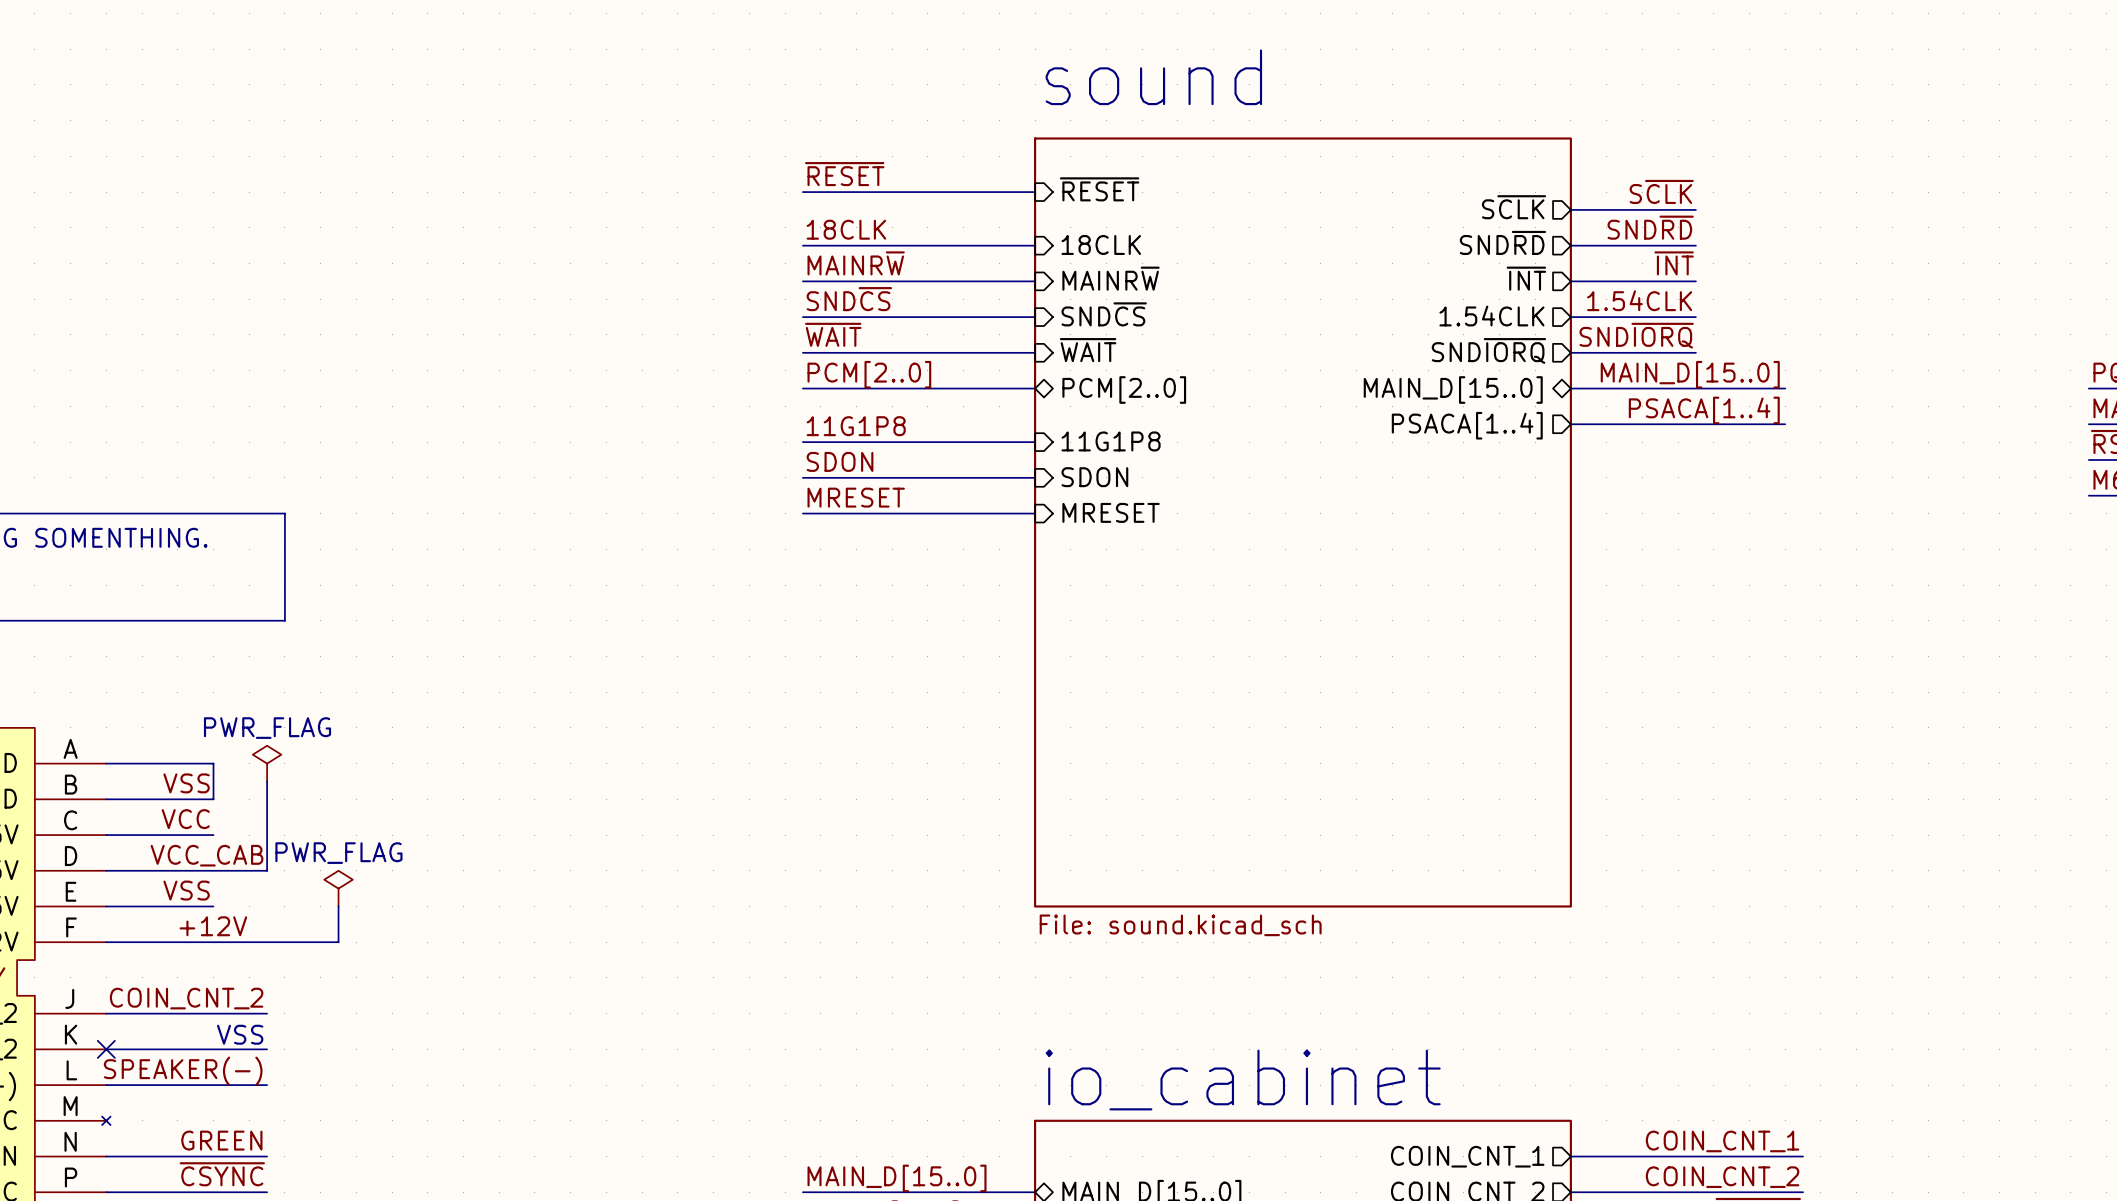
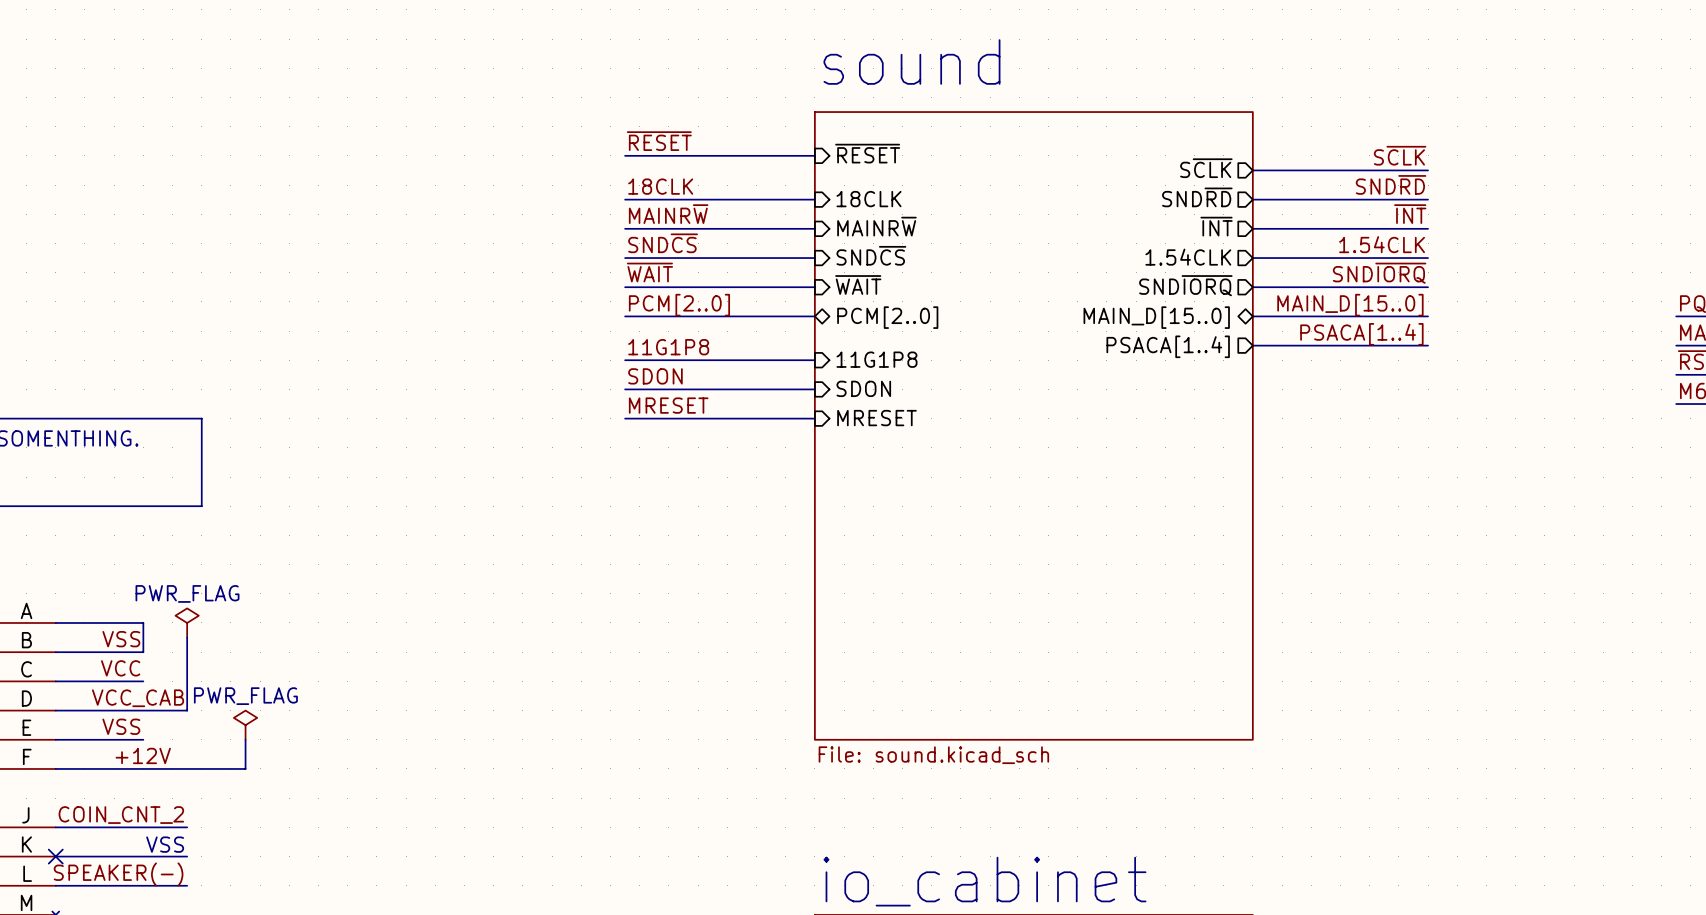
label position: S~{CLK} (1661, 191) -> S~{CLK} (1400, 155)
wire: none -> (1355, 170) (1428, 170)
label position: SND~{RD} (1650, 227) -> SND~{RD} (1391, 184)
wire: none -> (1355, 199) (1428, 199)
label position: ~{INT} (1674, 263) -> ~{INT} (1410, 214)
wire: none -> (1355, 228) (1428, 228)
label position: 1.54CLK (1639, 300) -> 1.54CLK (1382, 244)
wire: none -> (1355, 258) (1428, 258)
label position: SND~{IORQ} (1636, 335) -> SND~{IORQ} (1379, 273)
wire: none -> (1355, 287) (1428, 287)

